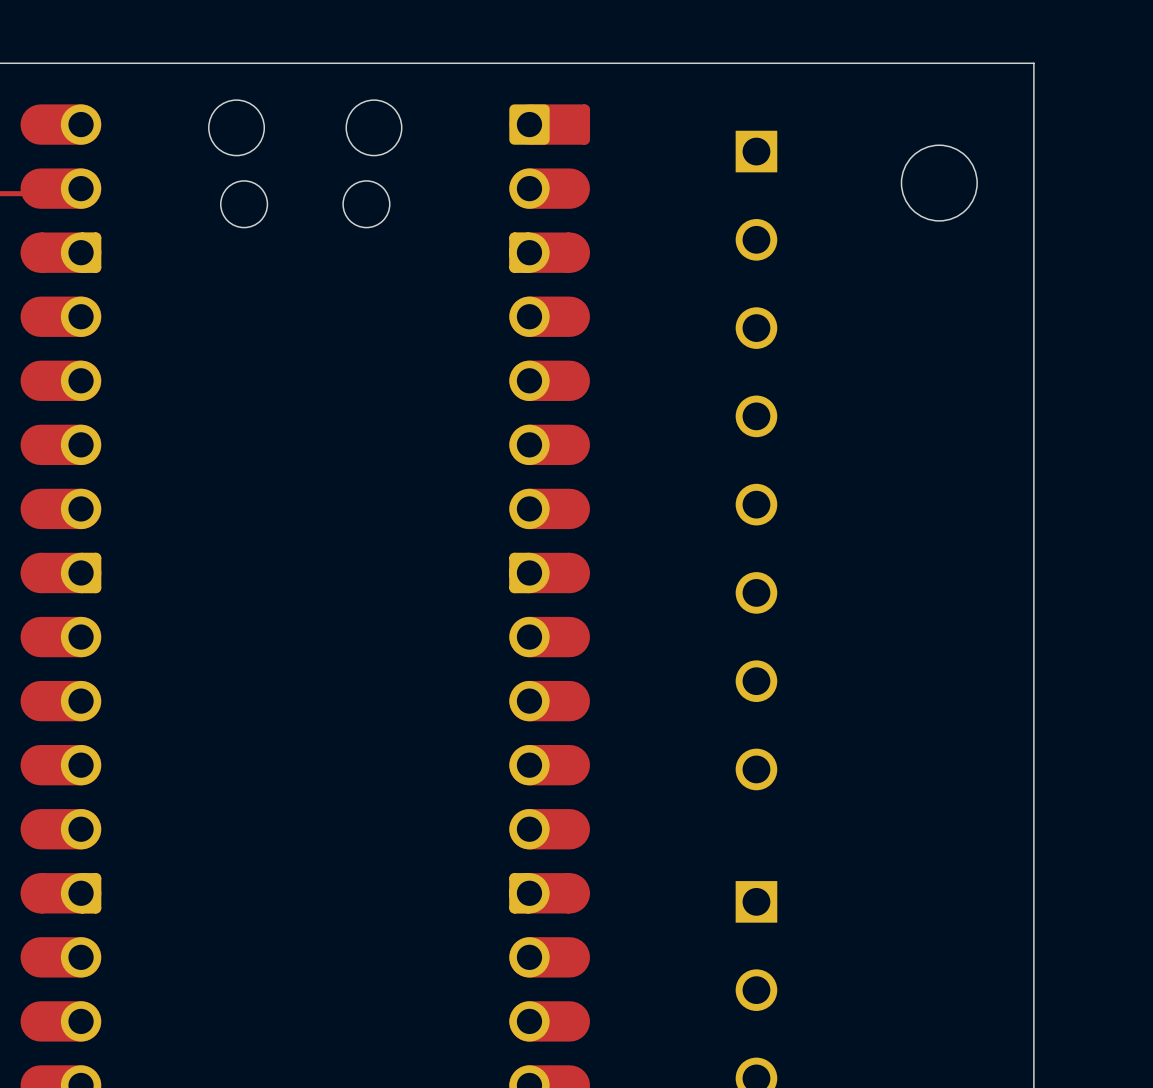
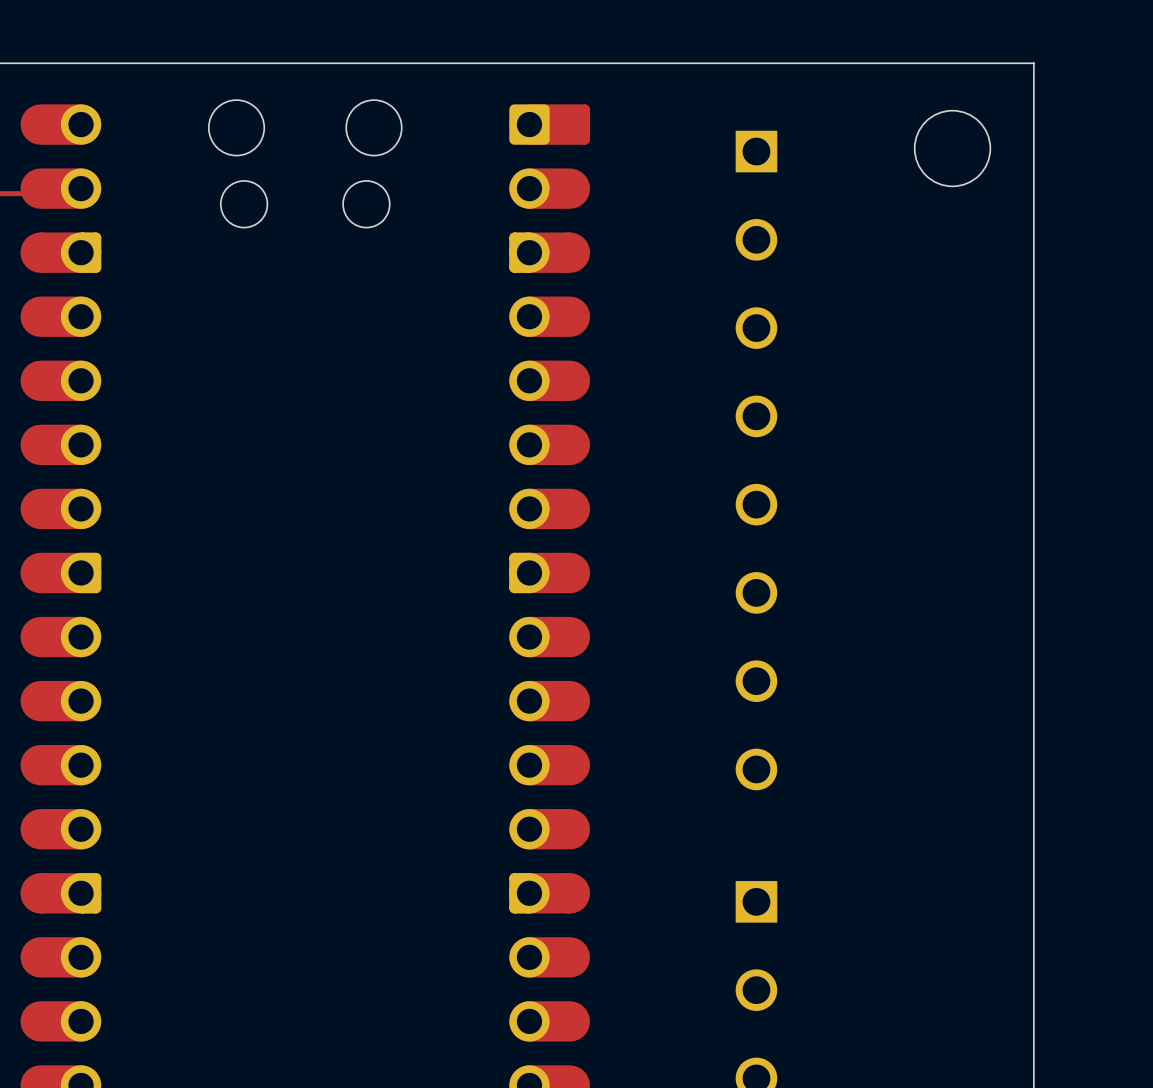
round board edge position: (939, 183) -> (952, 148)

